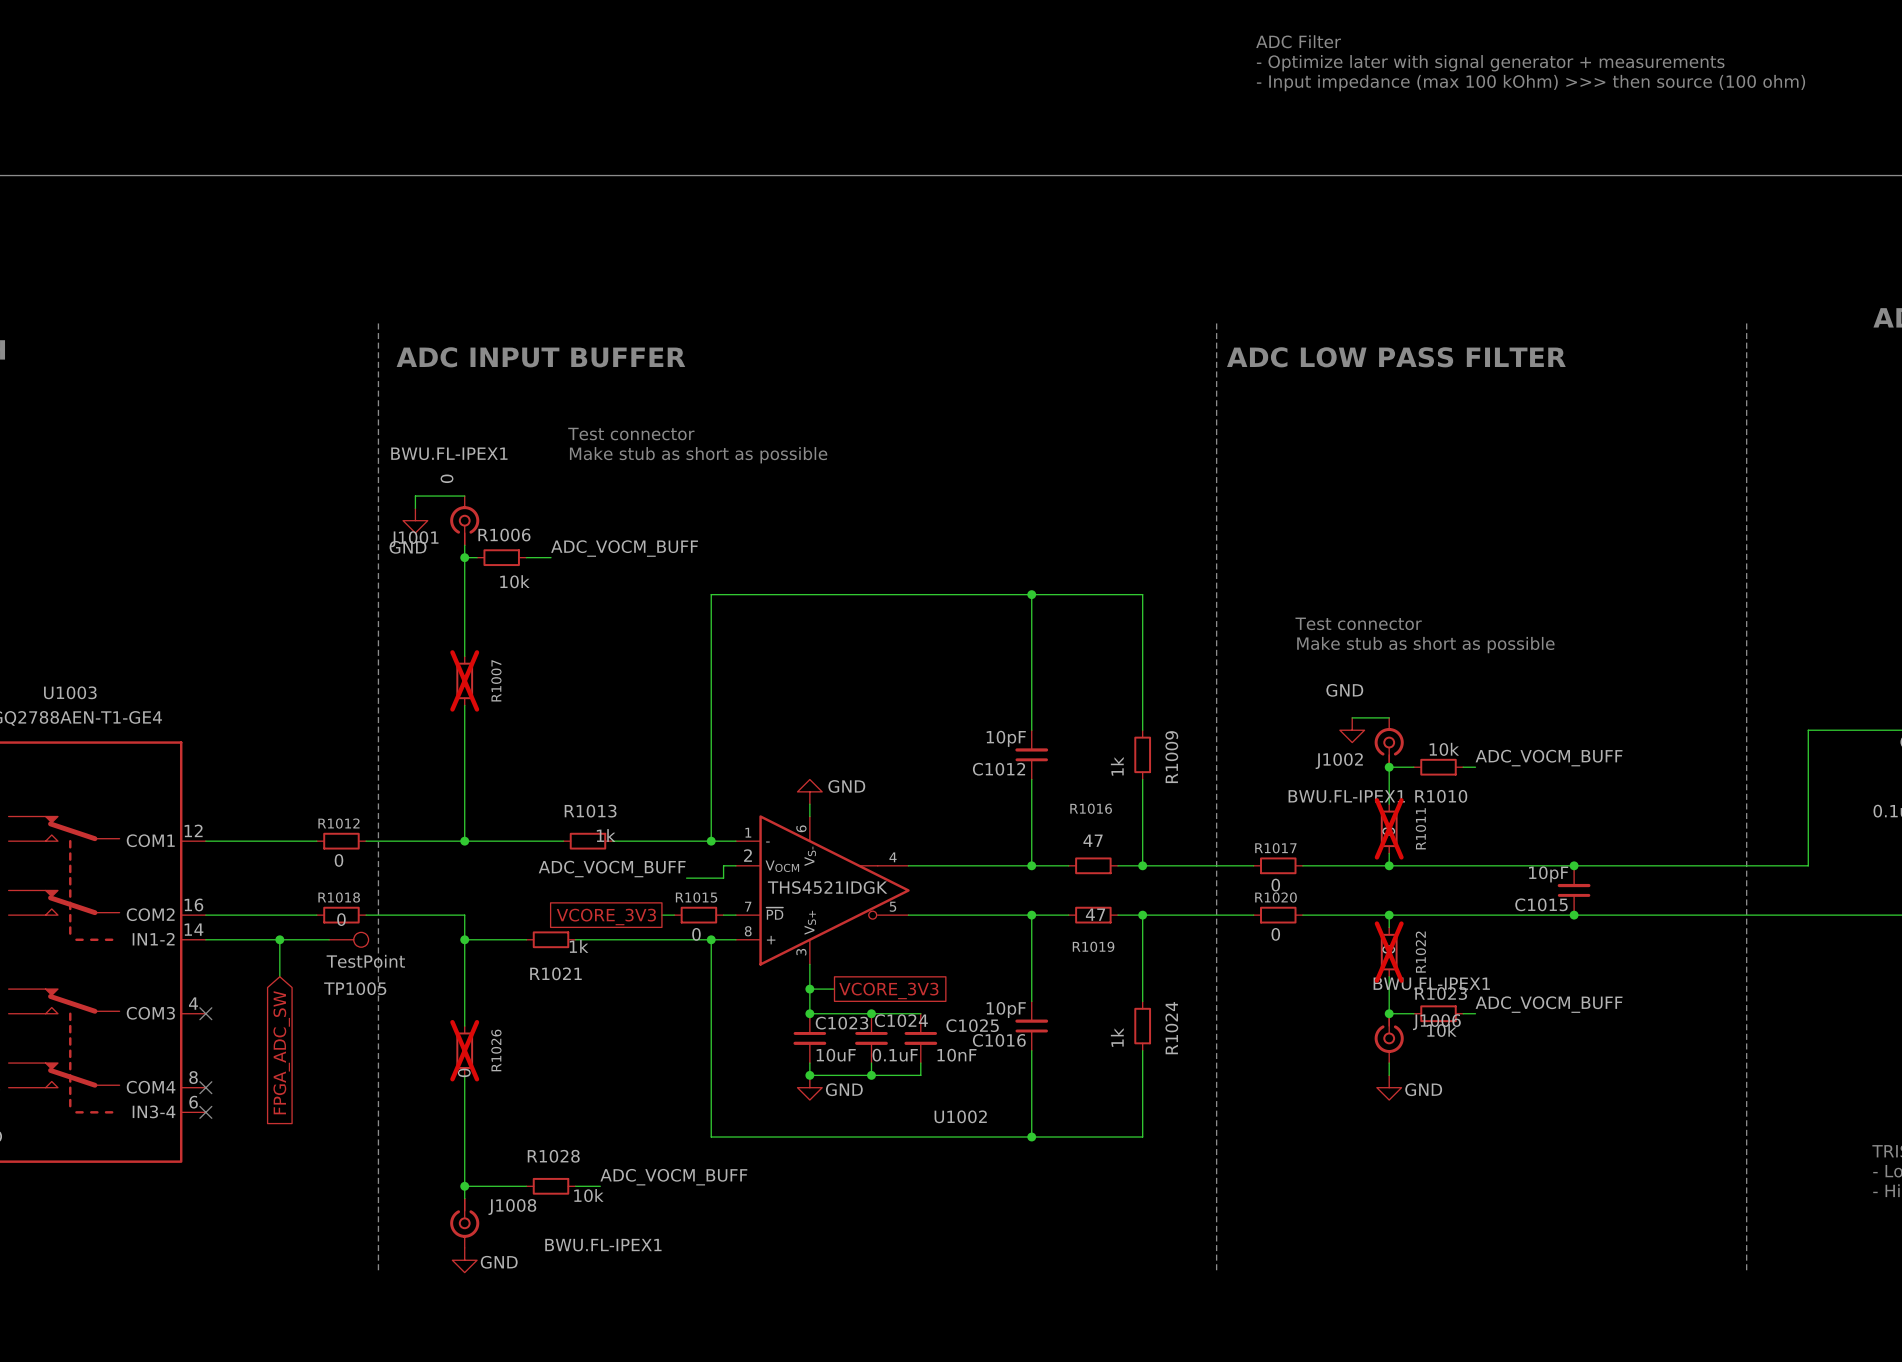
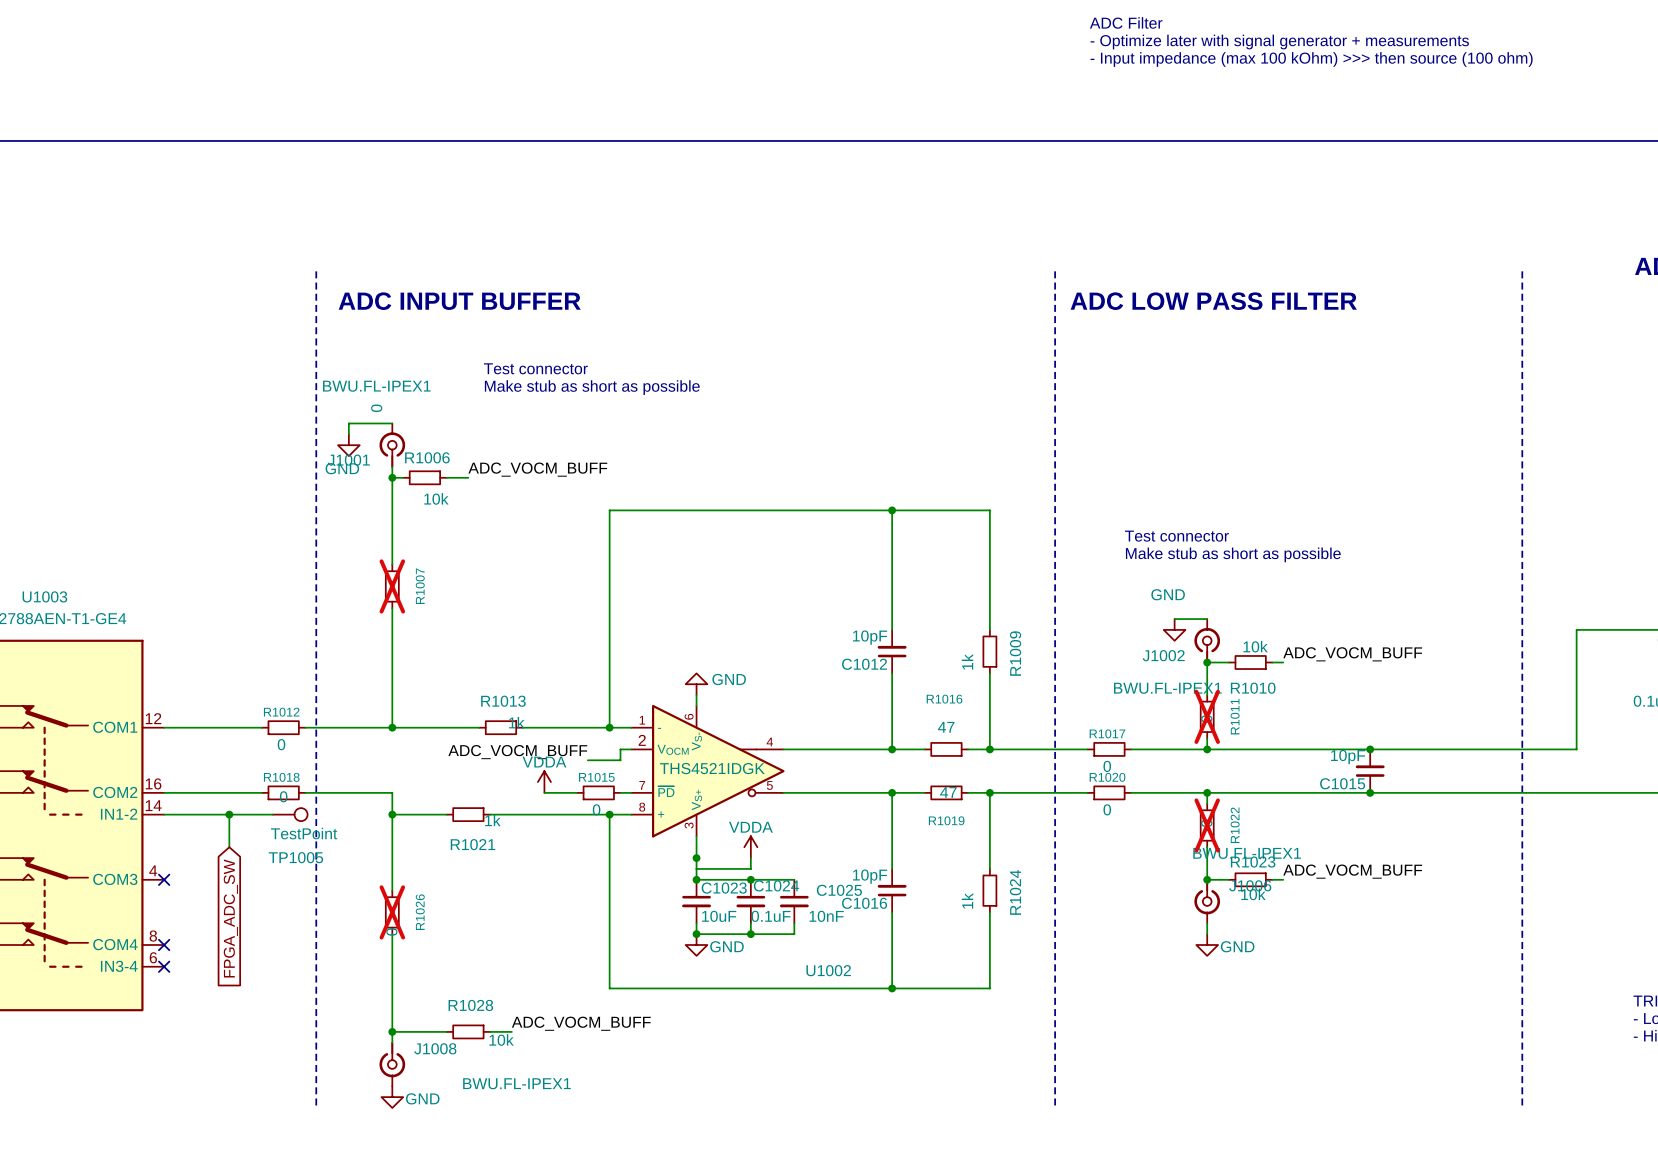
power symbol: none -> VDDA (544, 782)
global label: VCORE_3V3 (606, 917) -> none
power symbol: none -> VDDA (750, 847)
wire: (809, 989) (834, 989) -> (544, 792) (566, 792)
wire: none -> (750, 858) (750, 868) (696, 868)
global label: VCORE_3V3 (888, 990) -> none

